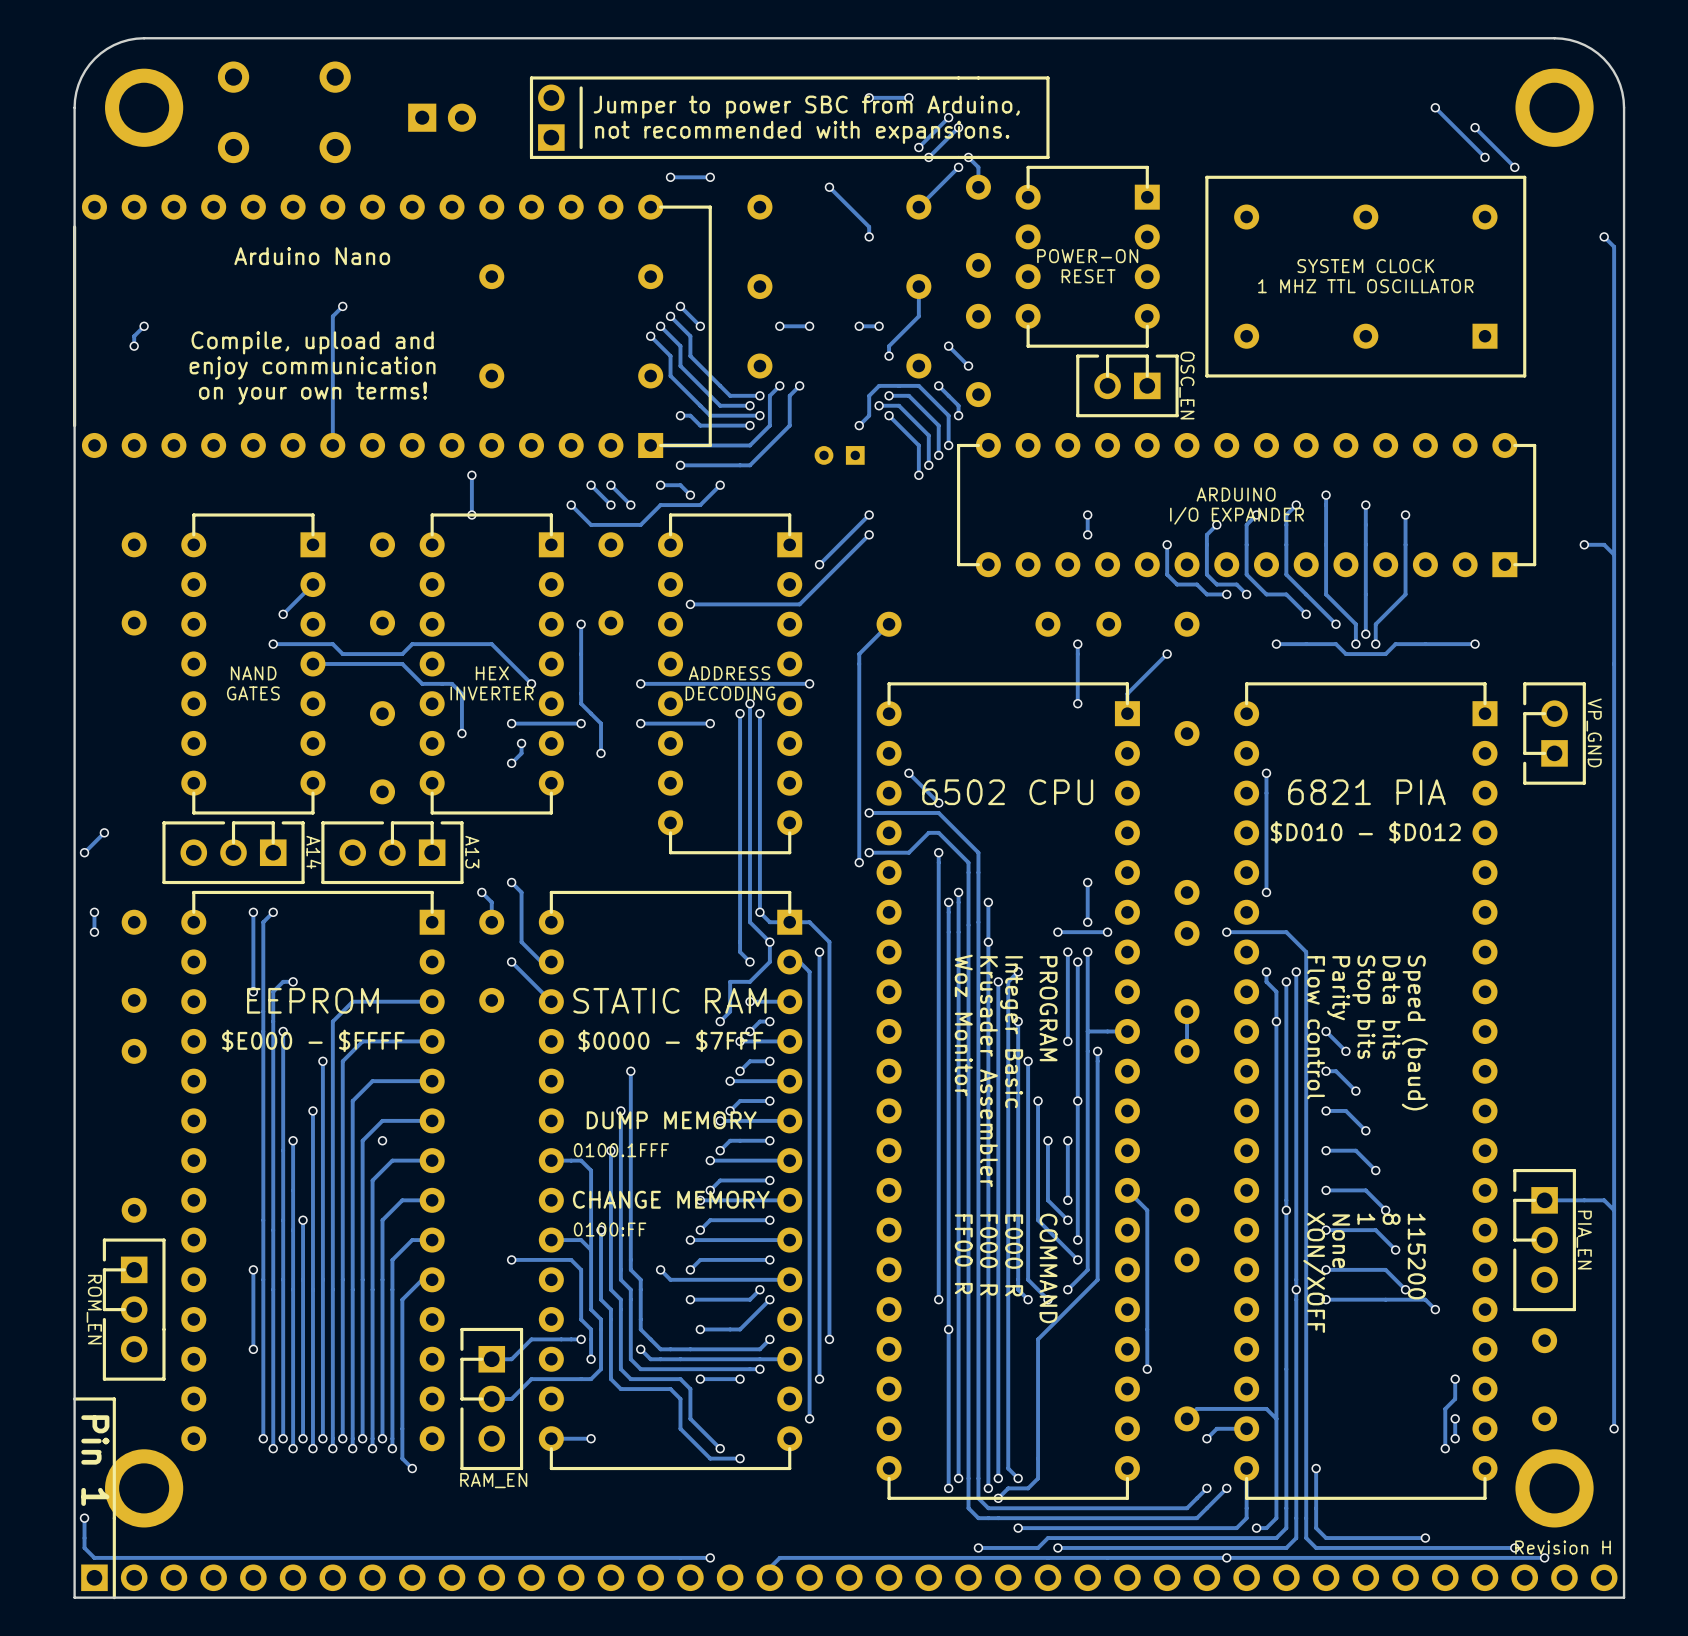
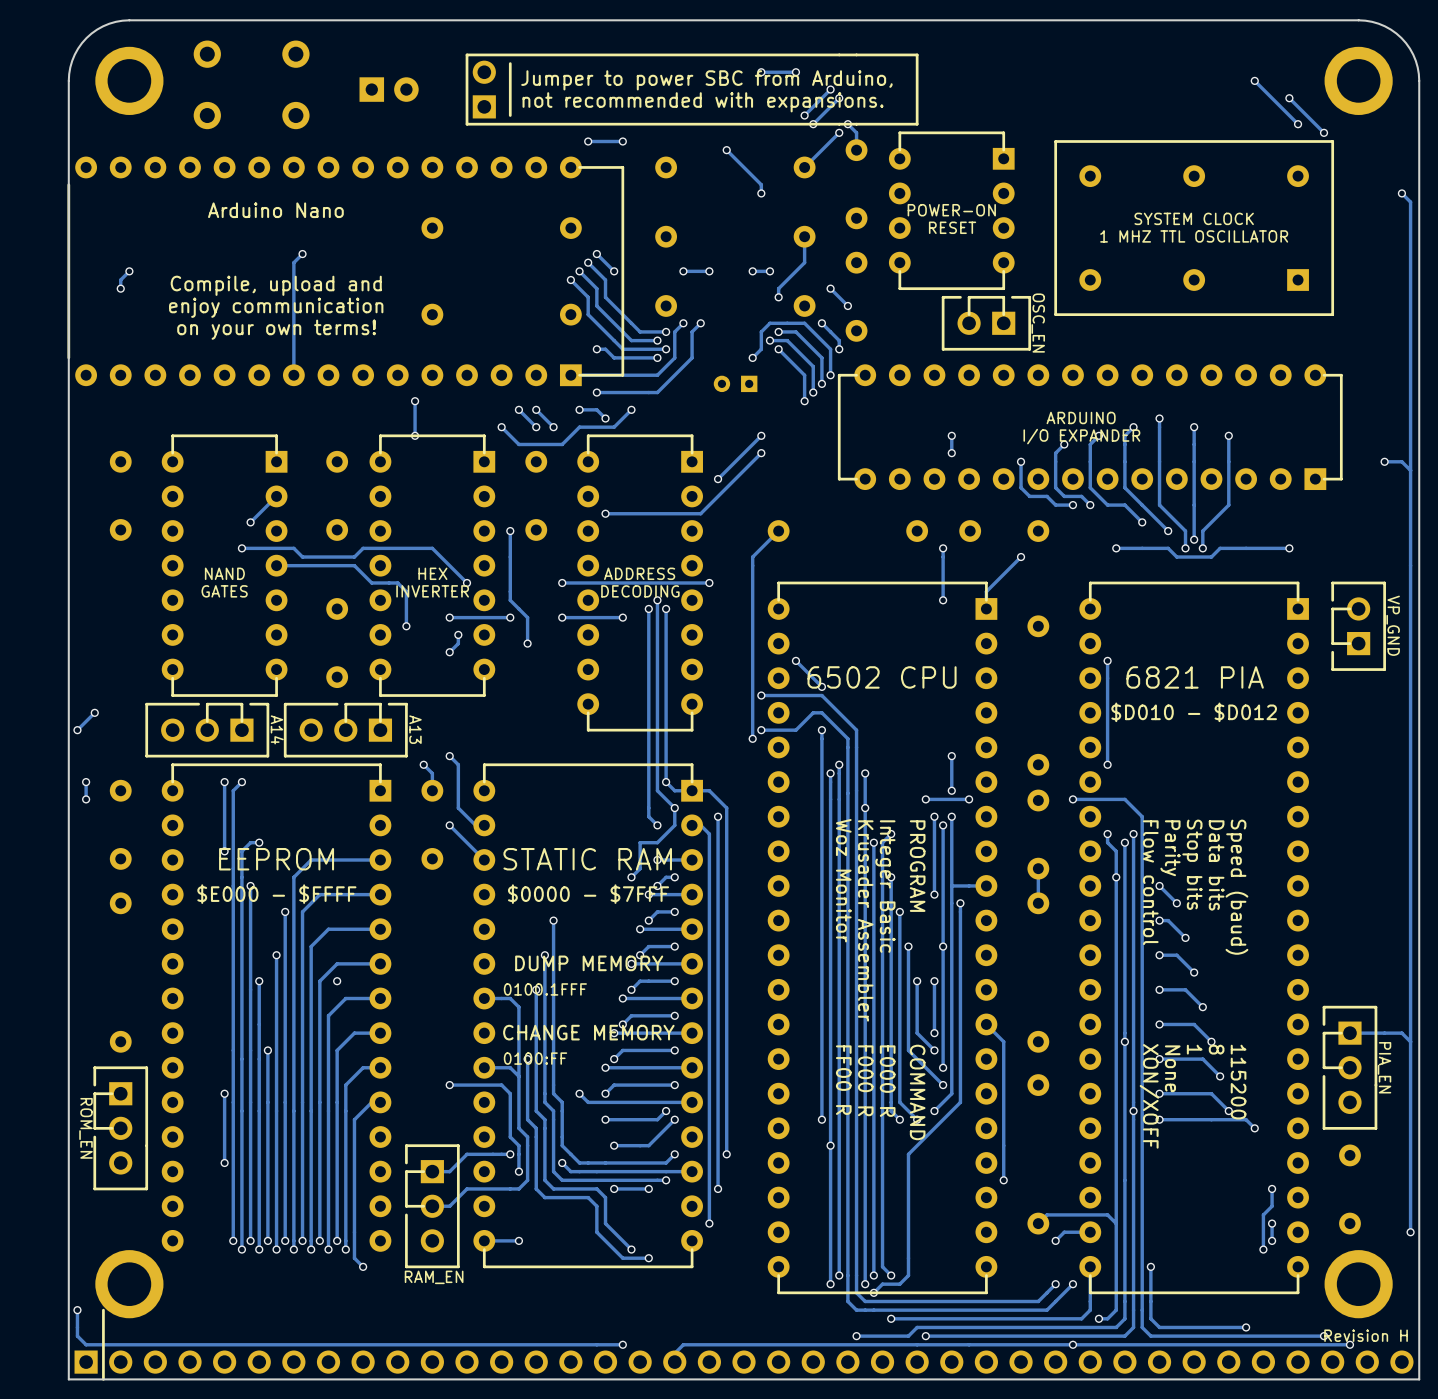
line: (74, 1398) (114, 1398) (114, 1518) -> none
text: Pin 1 (95, 1460) -> none

